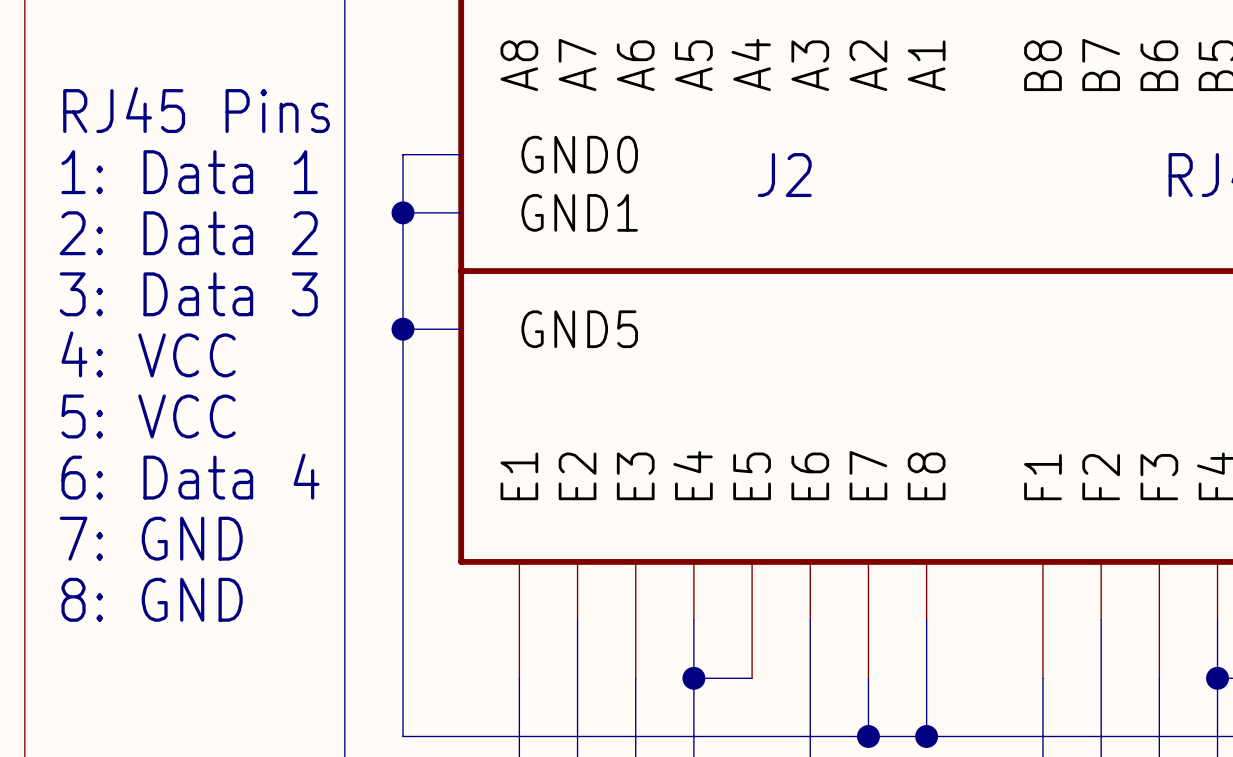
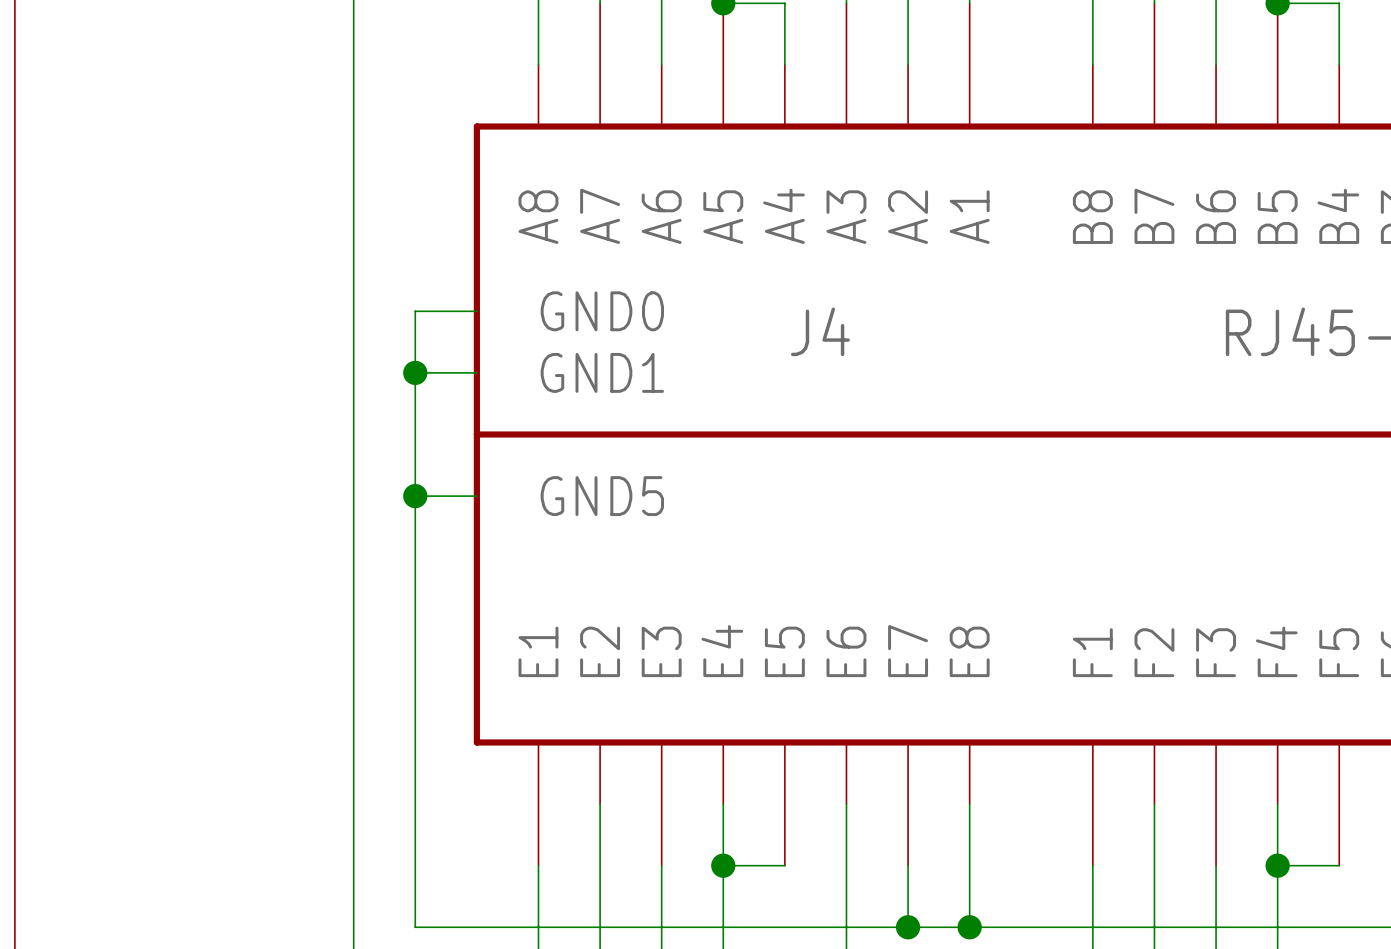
text: RJ45 Pins (196, 110) -> none
text: 1: Data 1 (189, 172) -> none
J2 name: J2 (784, 175) -> J4 (820, 331)
text: 2: Data 2 (188, 233) -> none
text: 3: Data 3 (188, 294) -> none
text: 4: VCC (148, 354) -> none
text: 5: VCC (148, 416) -> none
text: 6: Data 4 (190, 476) -> none
text: 7: GND (151, 538) -> none
text: 8: GND (152, 599) -> none

